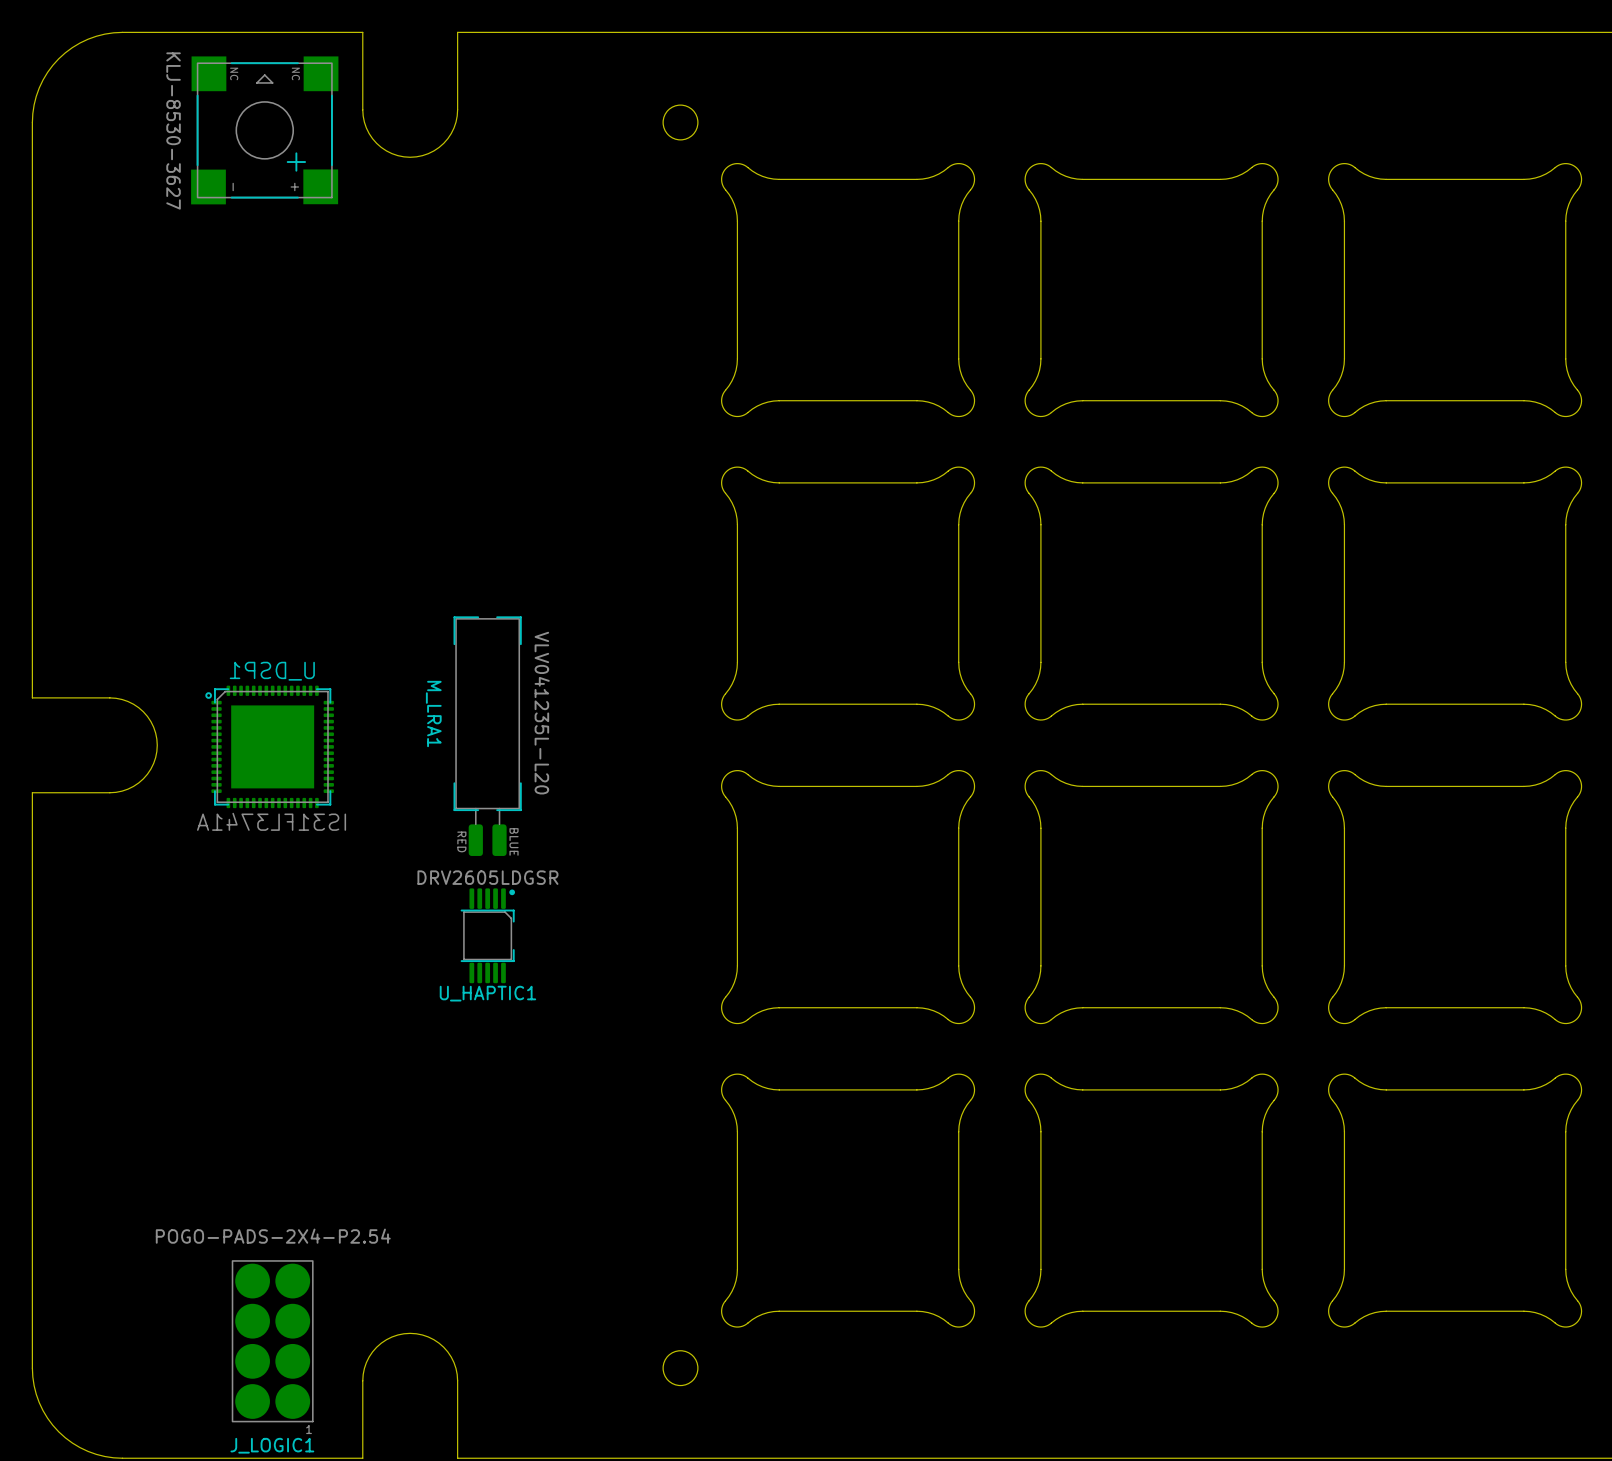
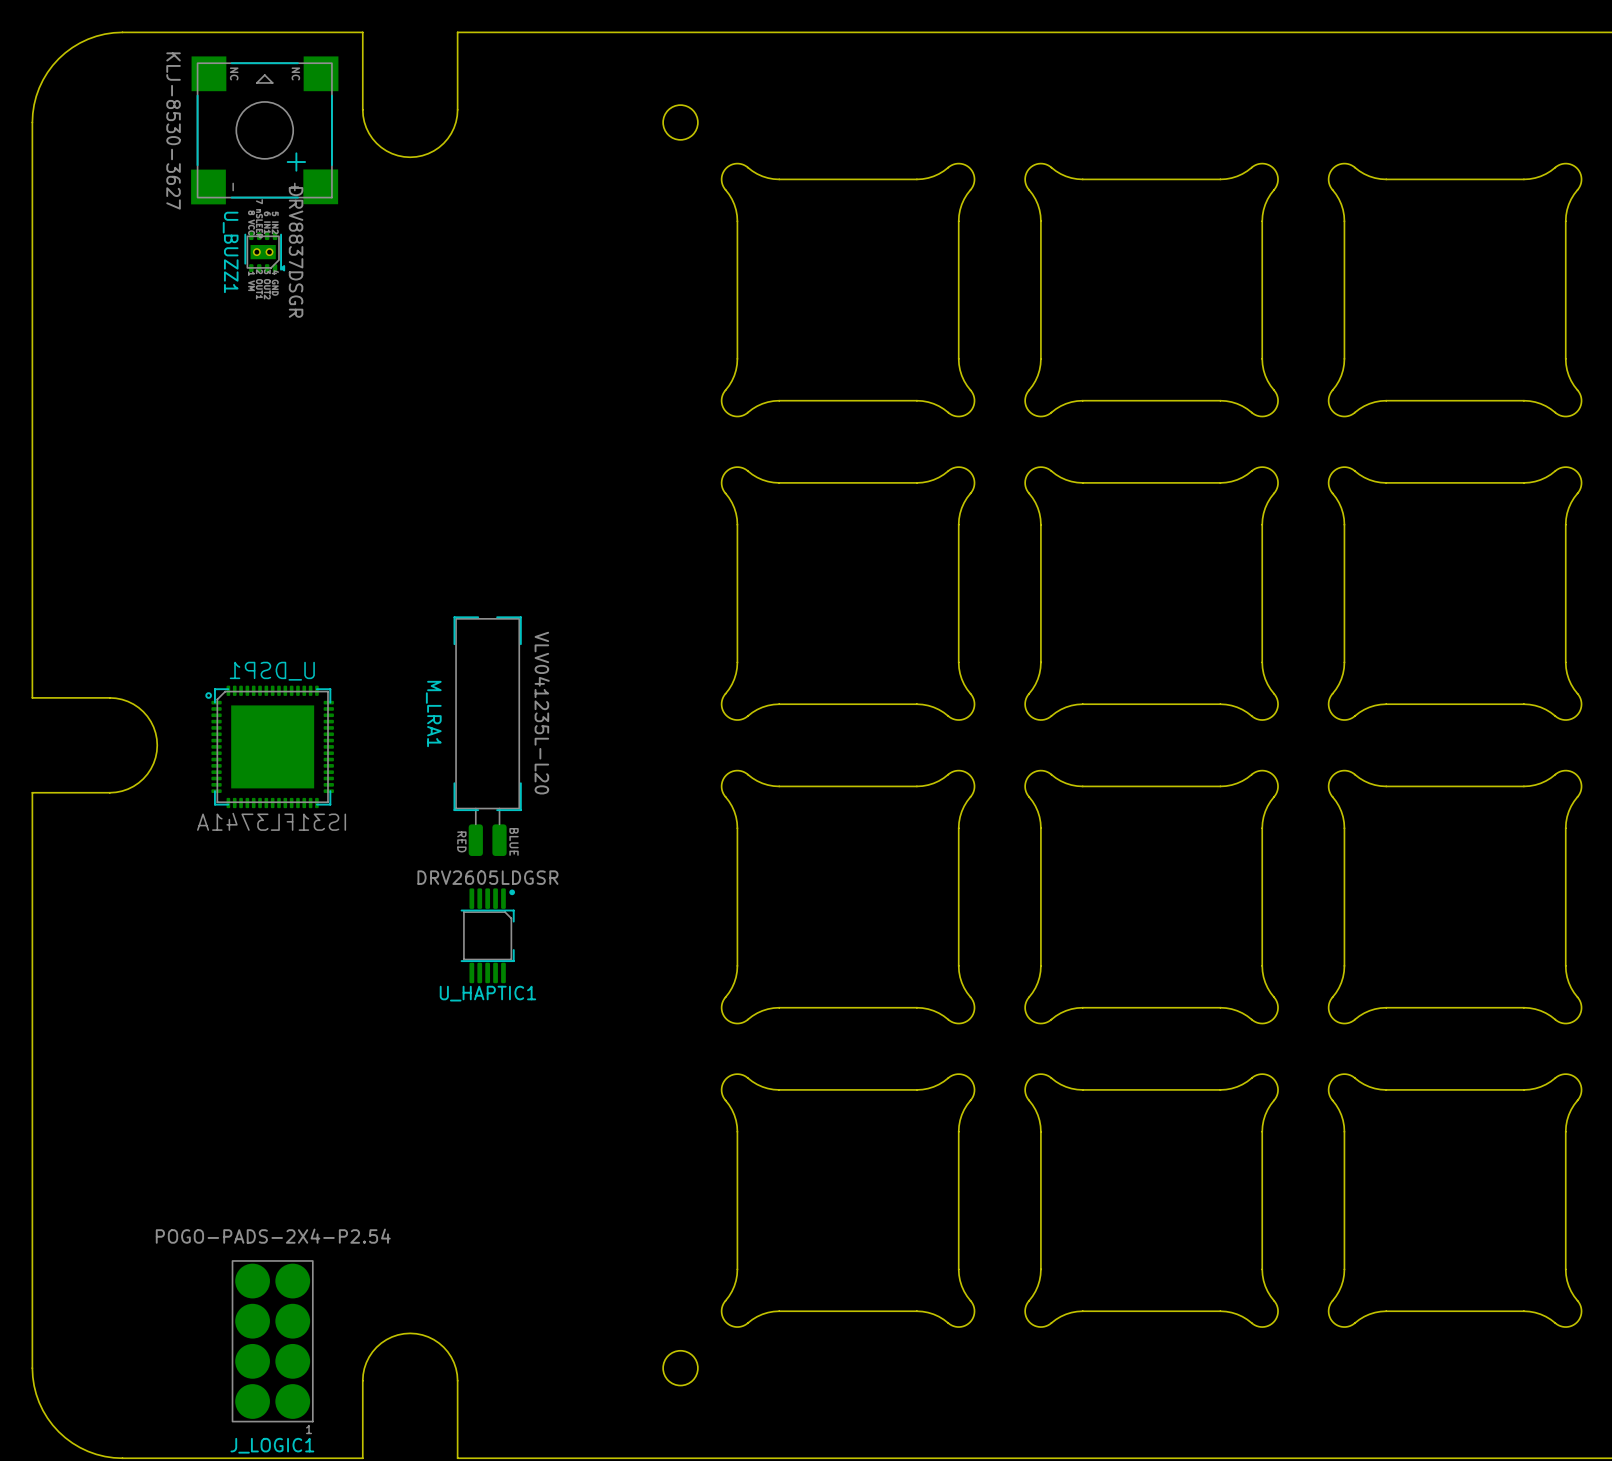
U_BUZZ1: none -> DRV8837DSGR (264, 252)

